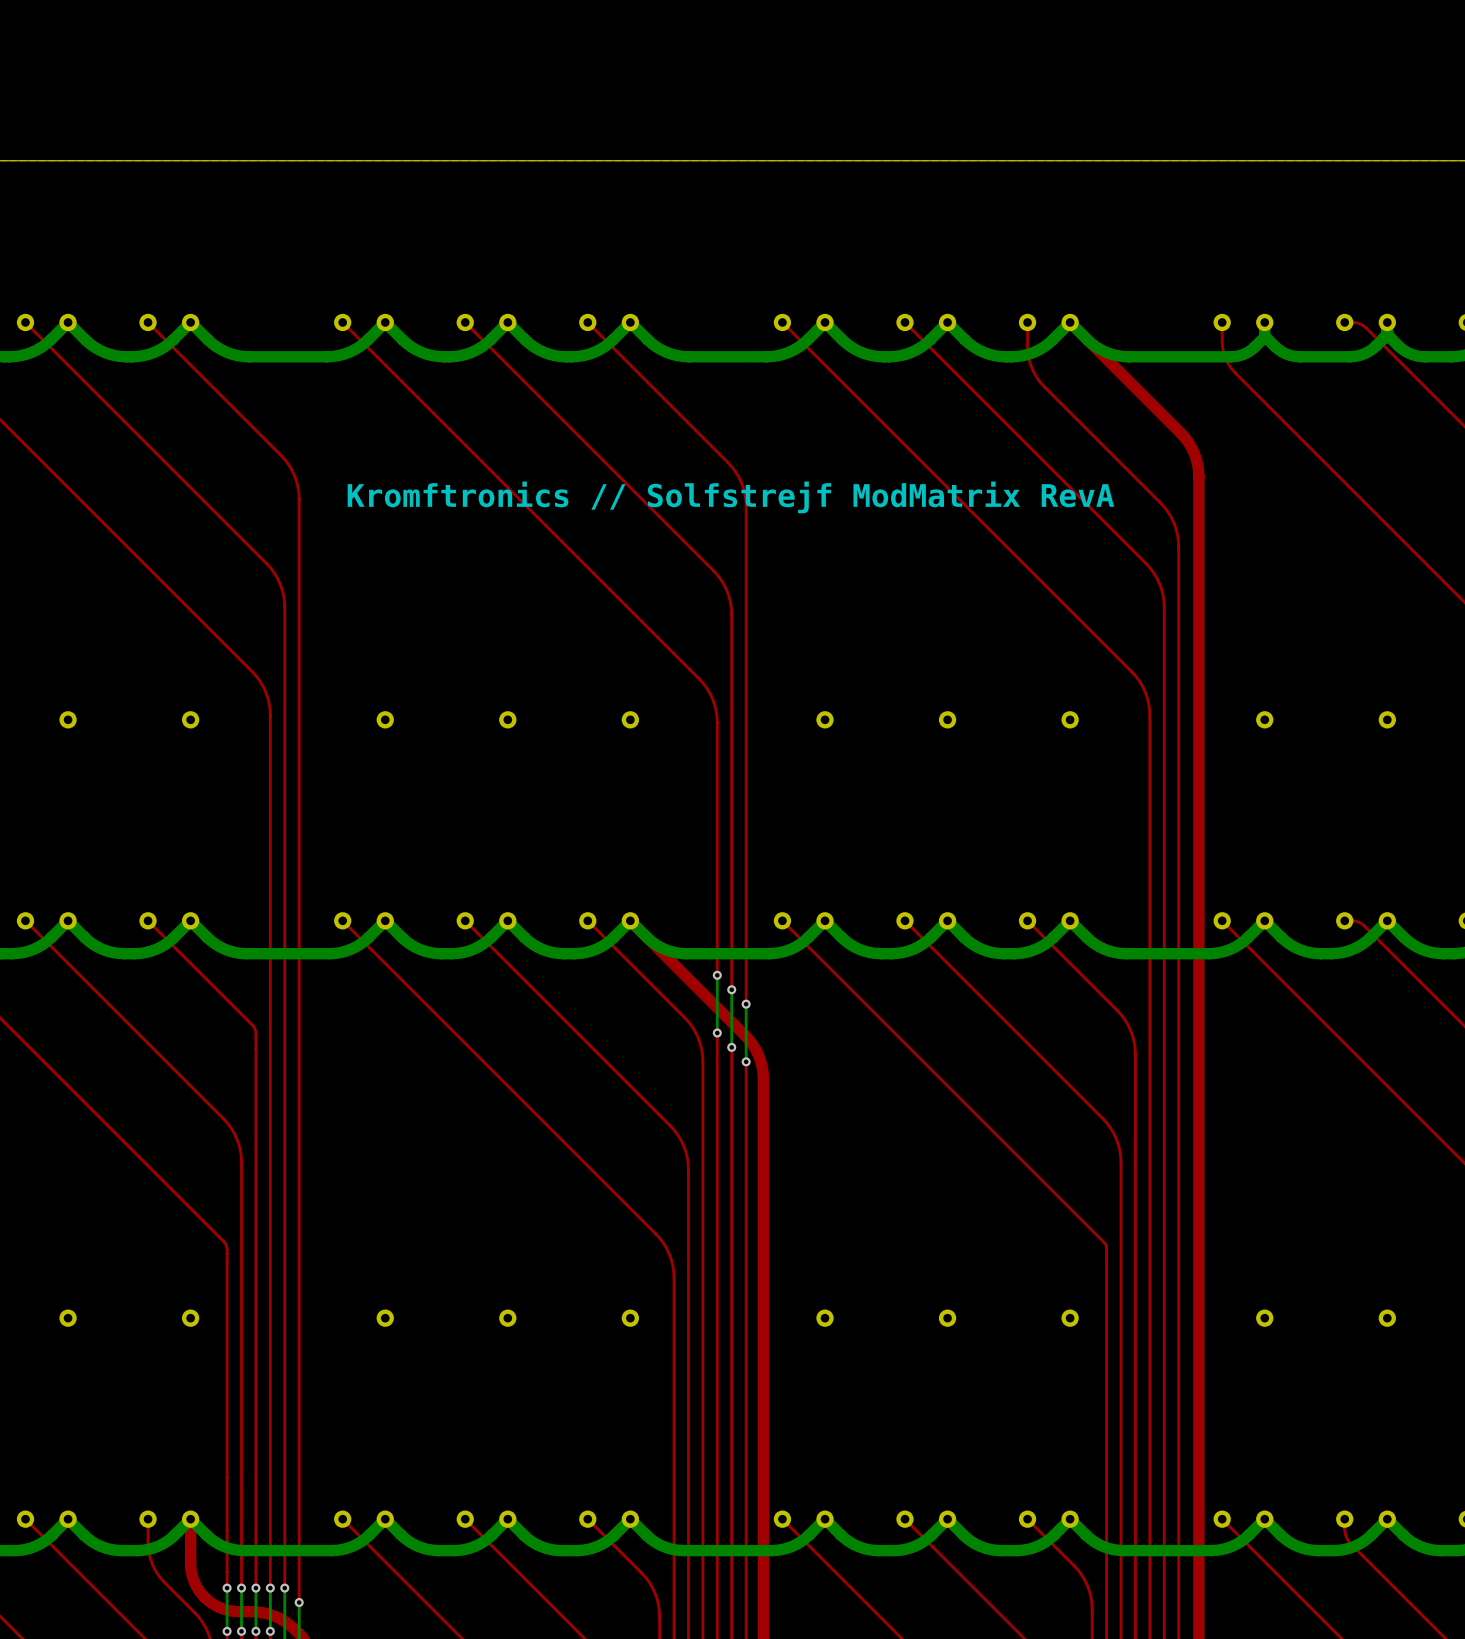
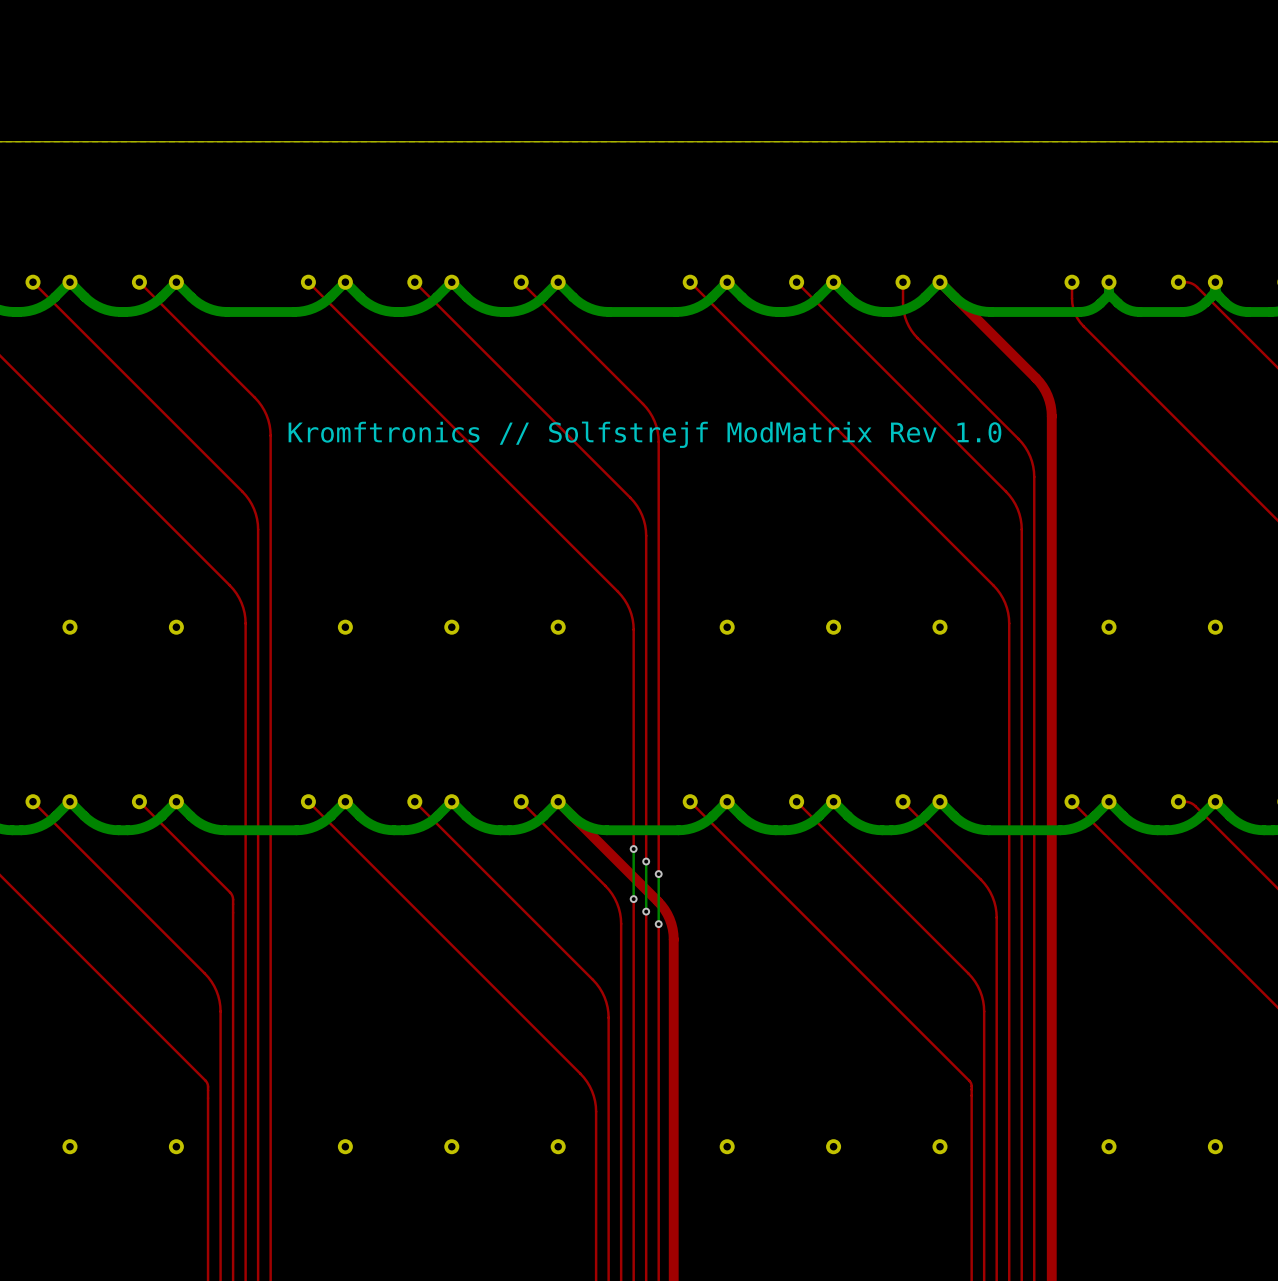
text: Kromftronics // Solfstrejf ModMatrix RevA (730, 497) -> Kromftronics // Solfstrejf ModMatrix Rev 1.0 (644, 434)

